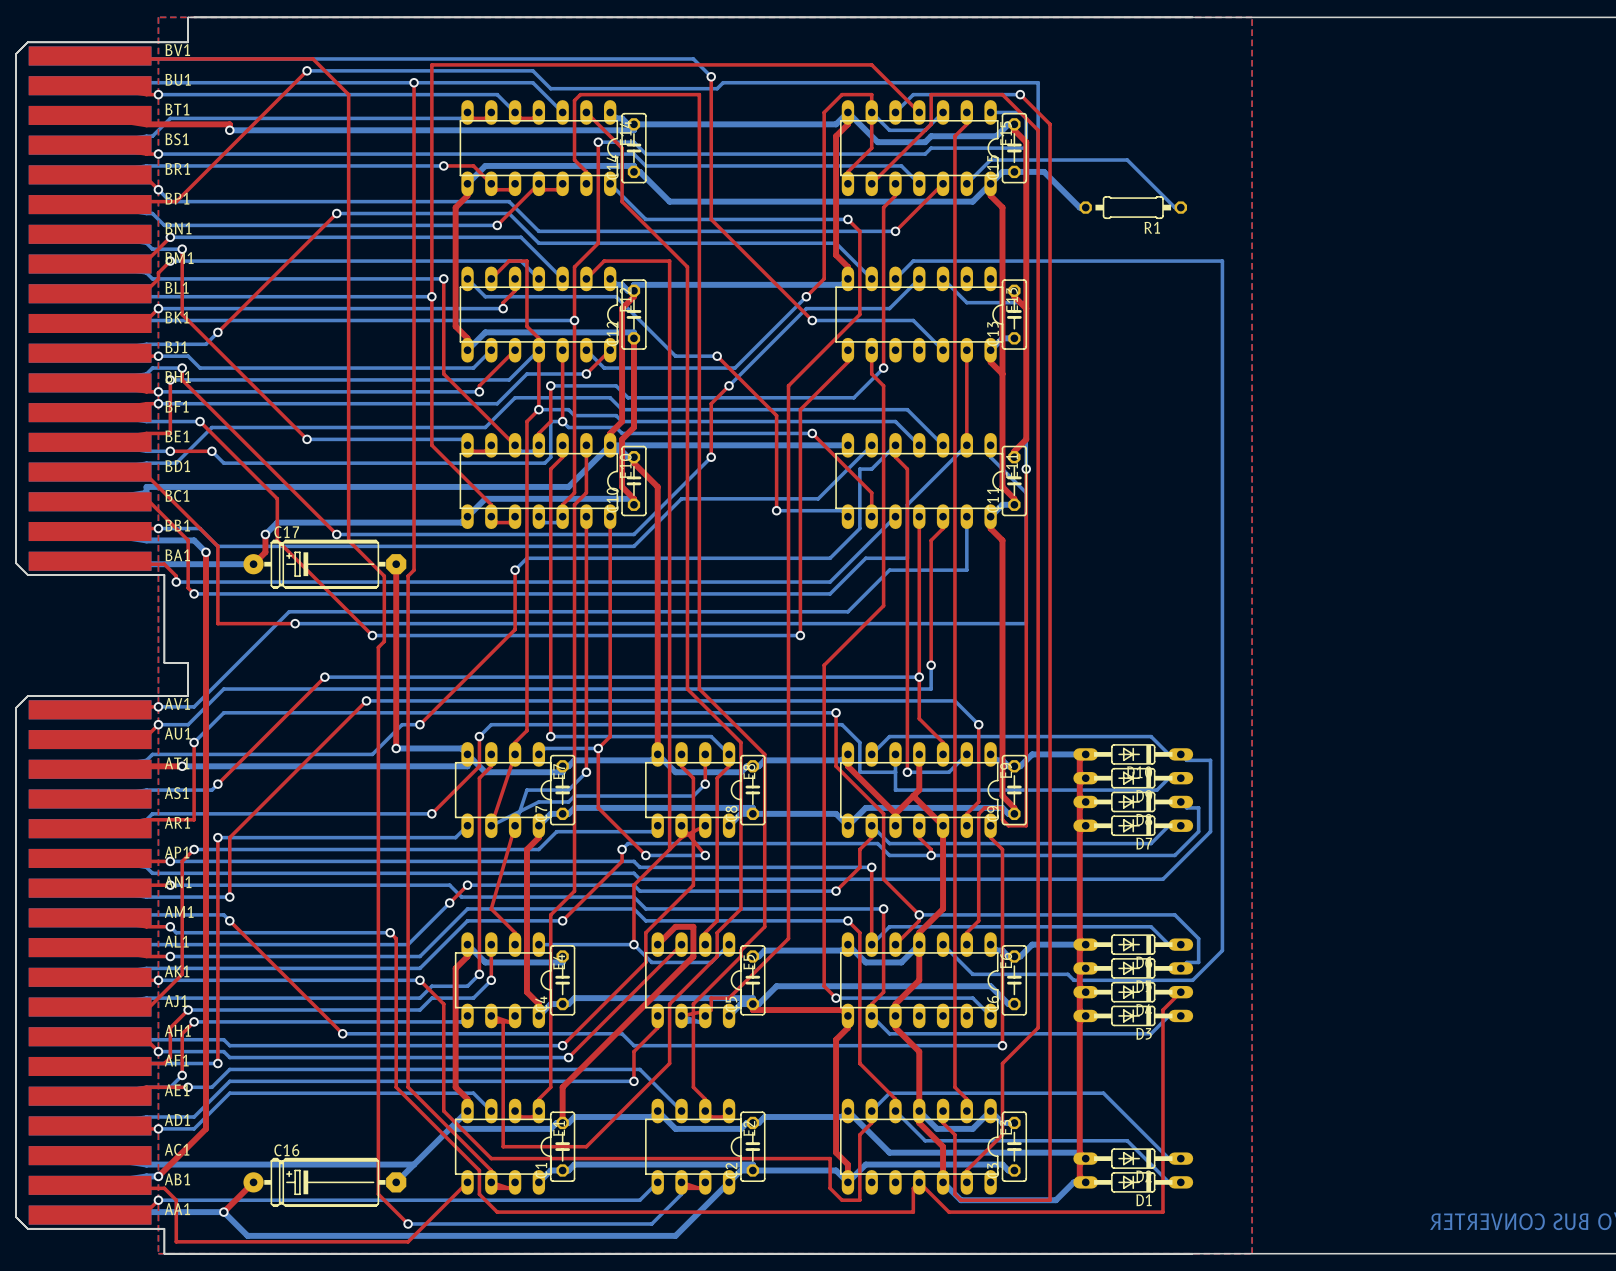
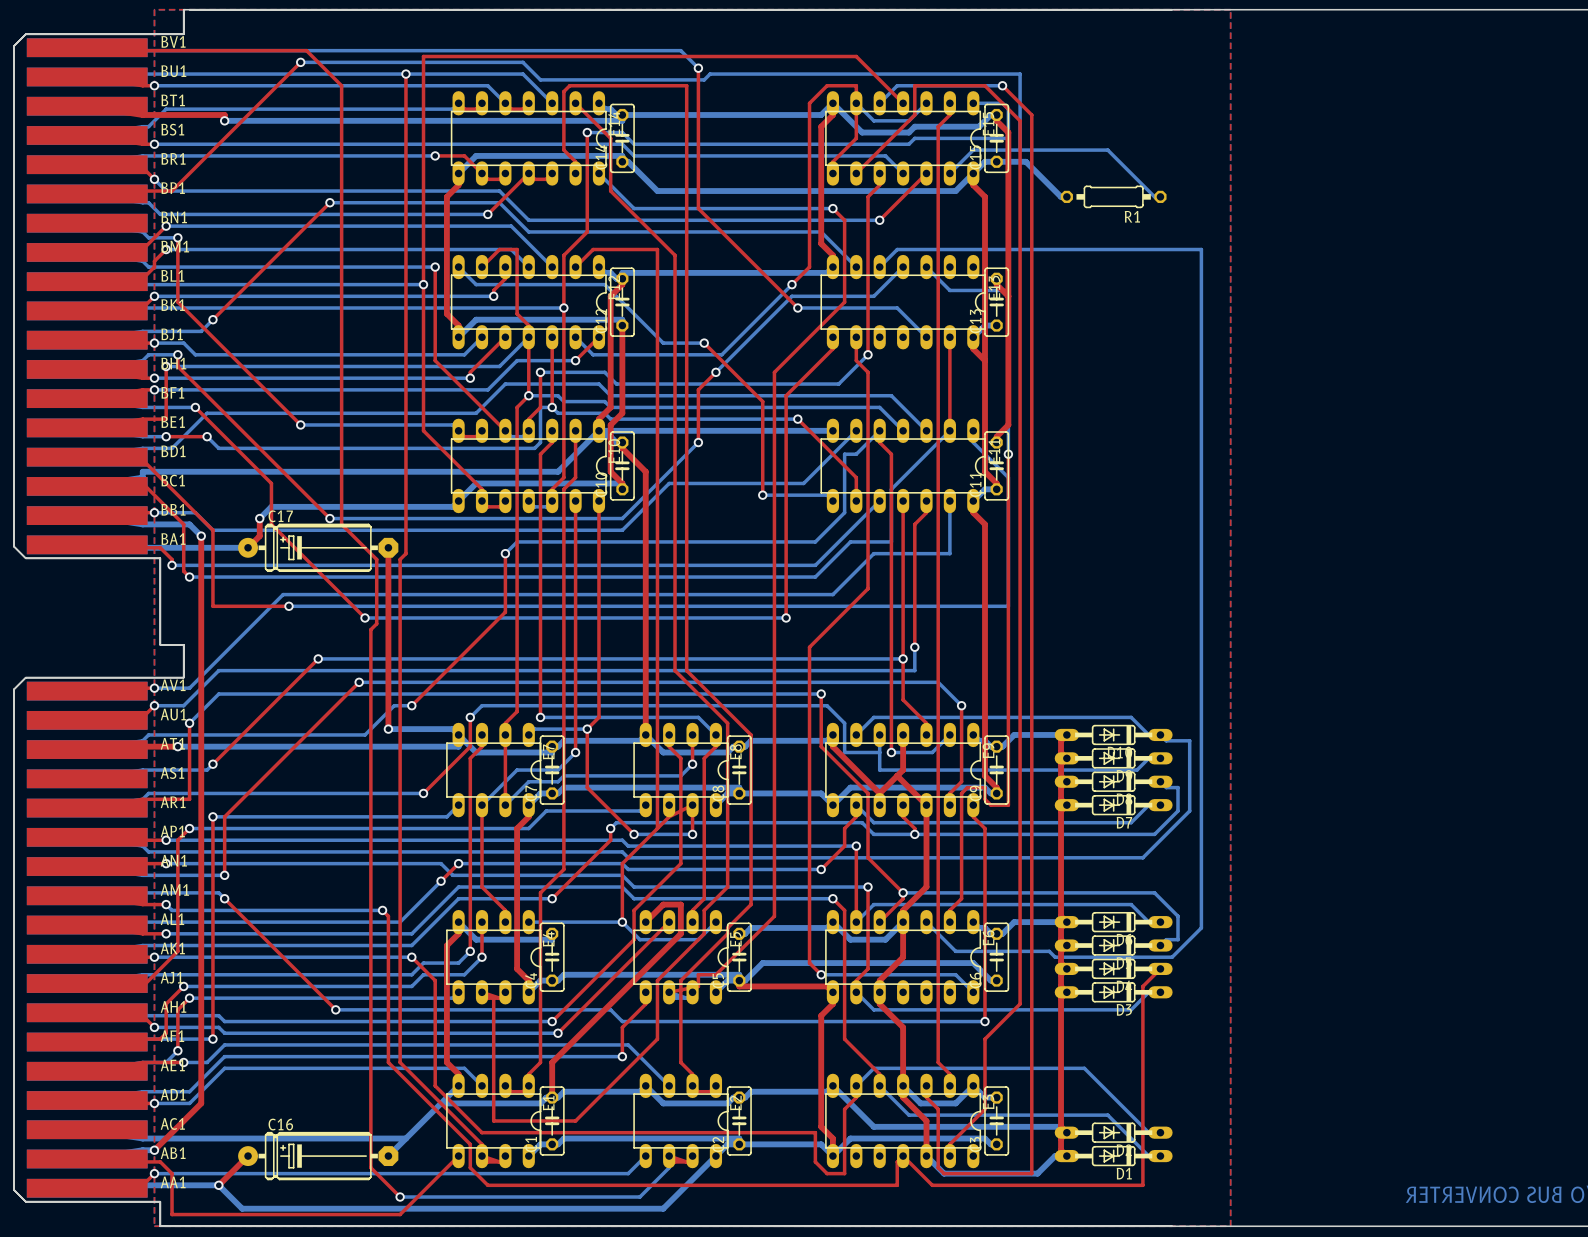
top track: (515, 754) (491, 825) -> (505, 734) (505, 805)
bottom track: (526, 790) (515, 825) -> (528, 781) (505, 805)
bottom track: (538, 801) (491, 825) -> (517, 770) (482, 805)
top track: (515, 825) (491, 908) -> (482, 805) (482, 887)
top track: (681, 825) (705, 855) -> (692, 805) (692, 834)

